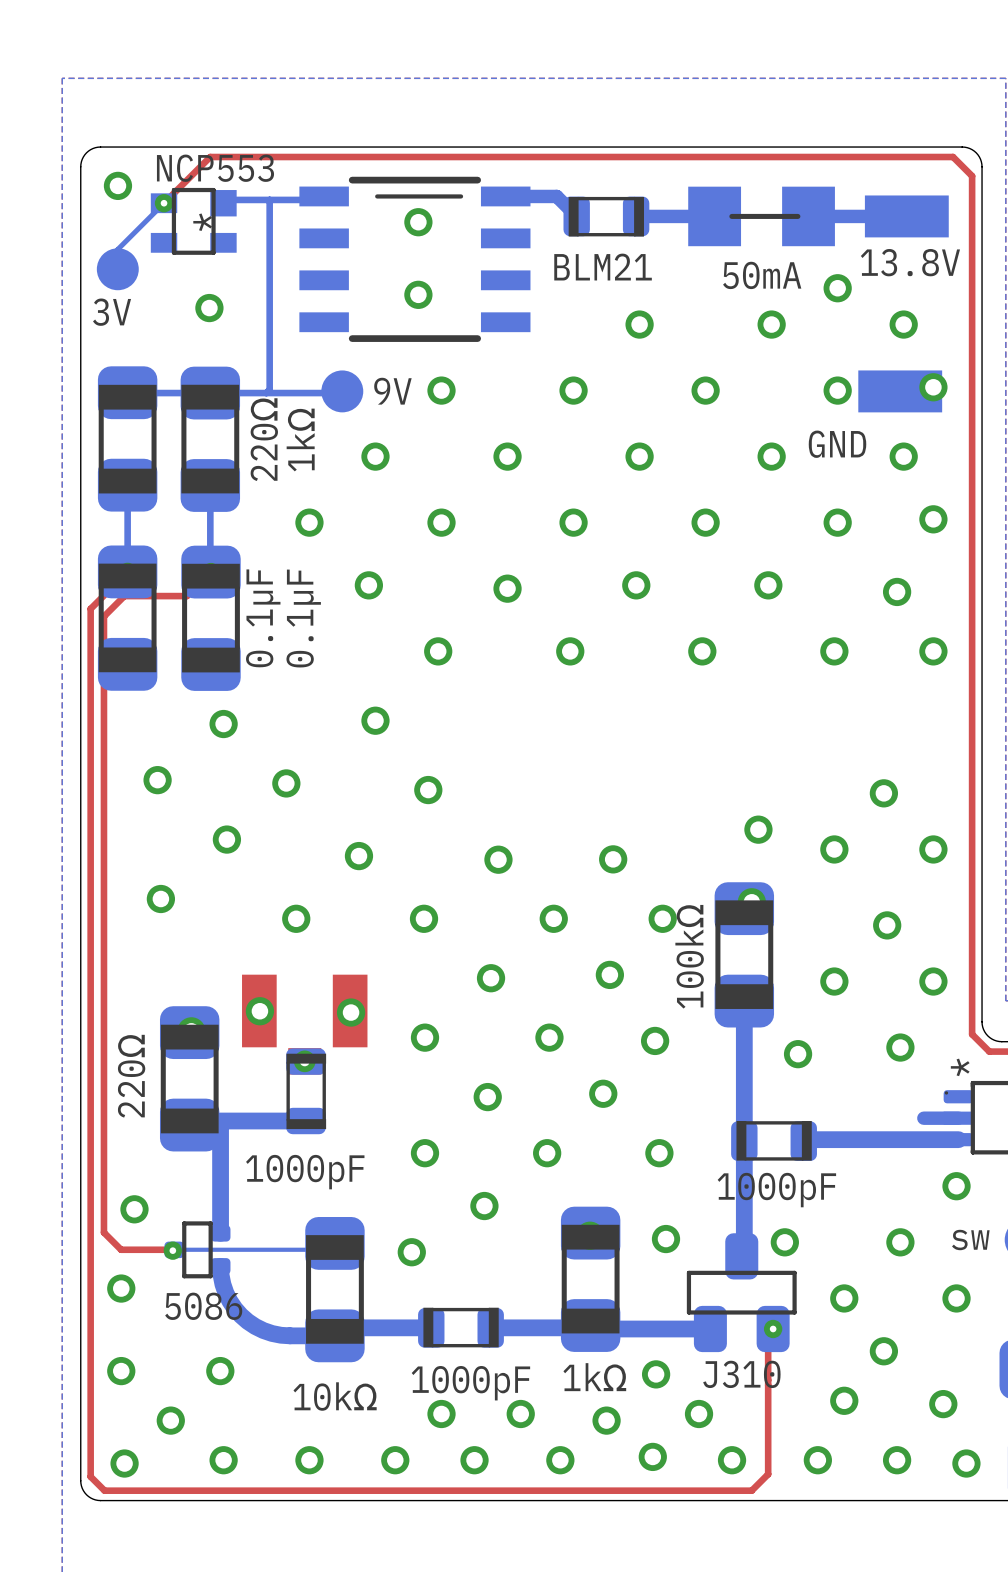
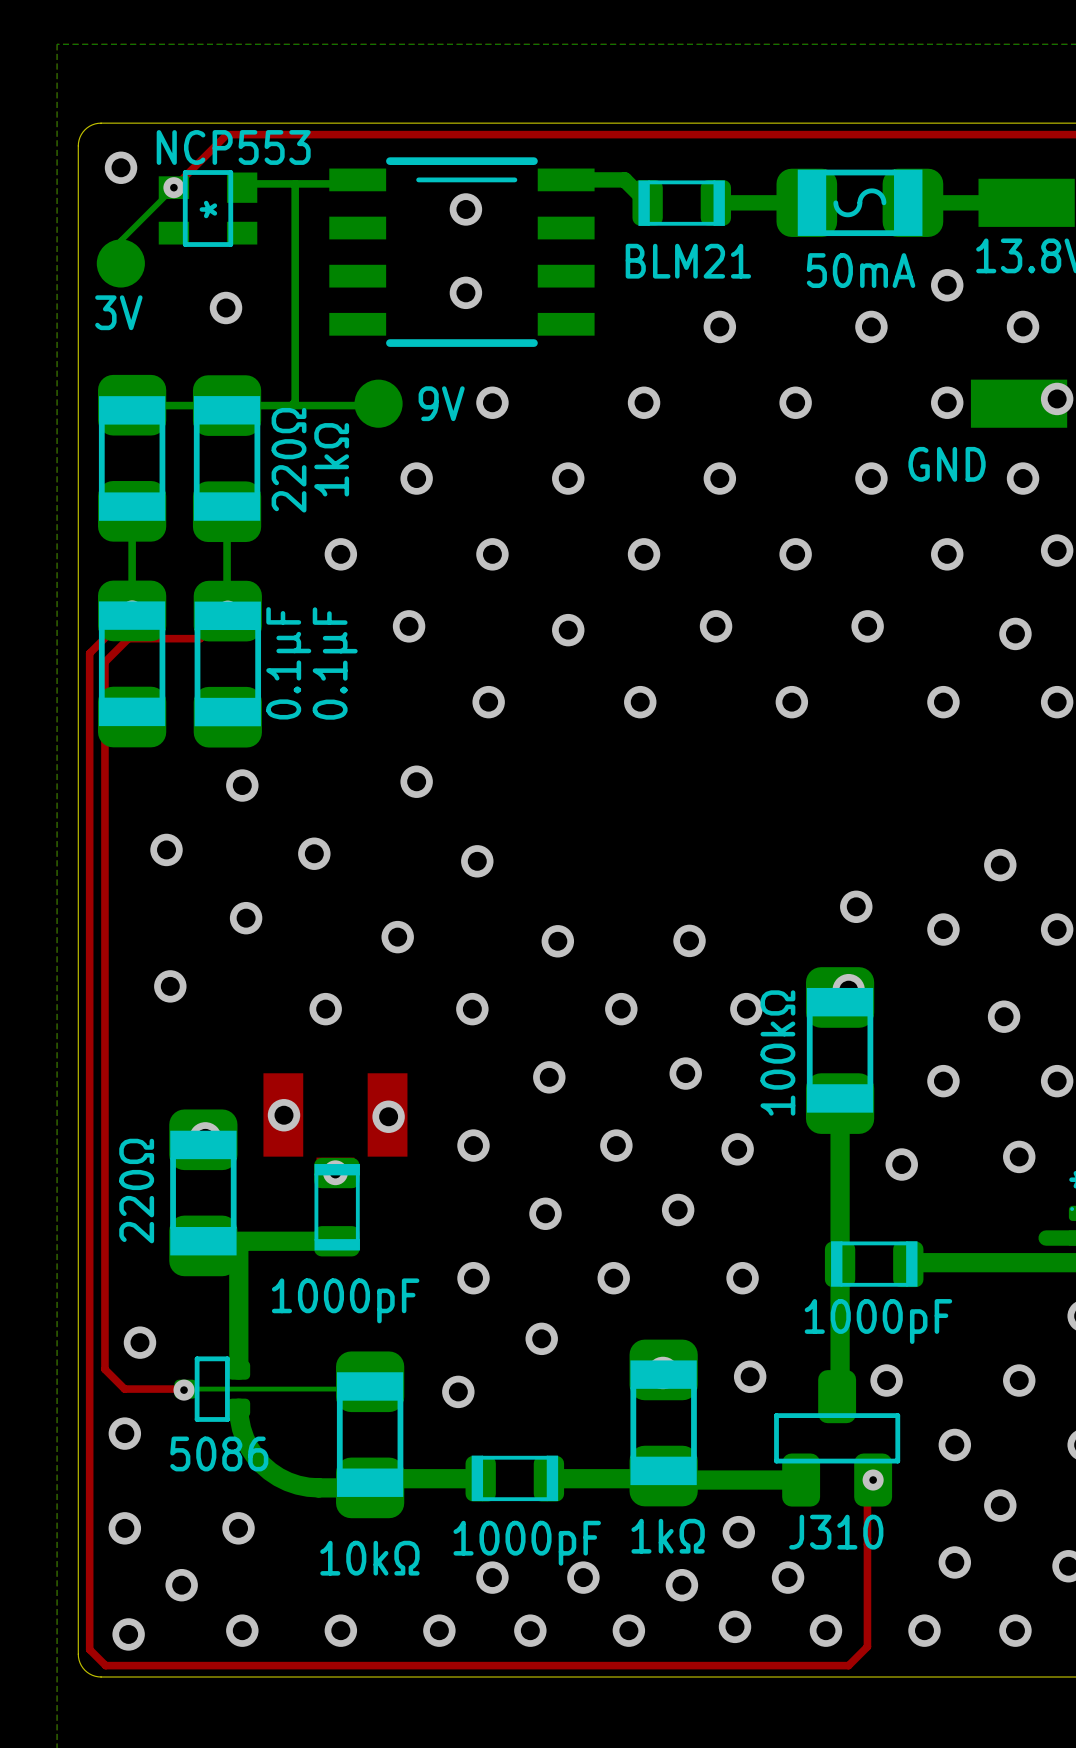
part footprint: [688, 186, 835, 247] -> [776, 168, 944, 237]
line: (797, 216) (731, 216) -> none

